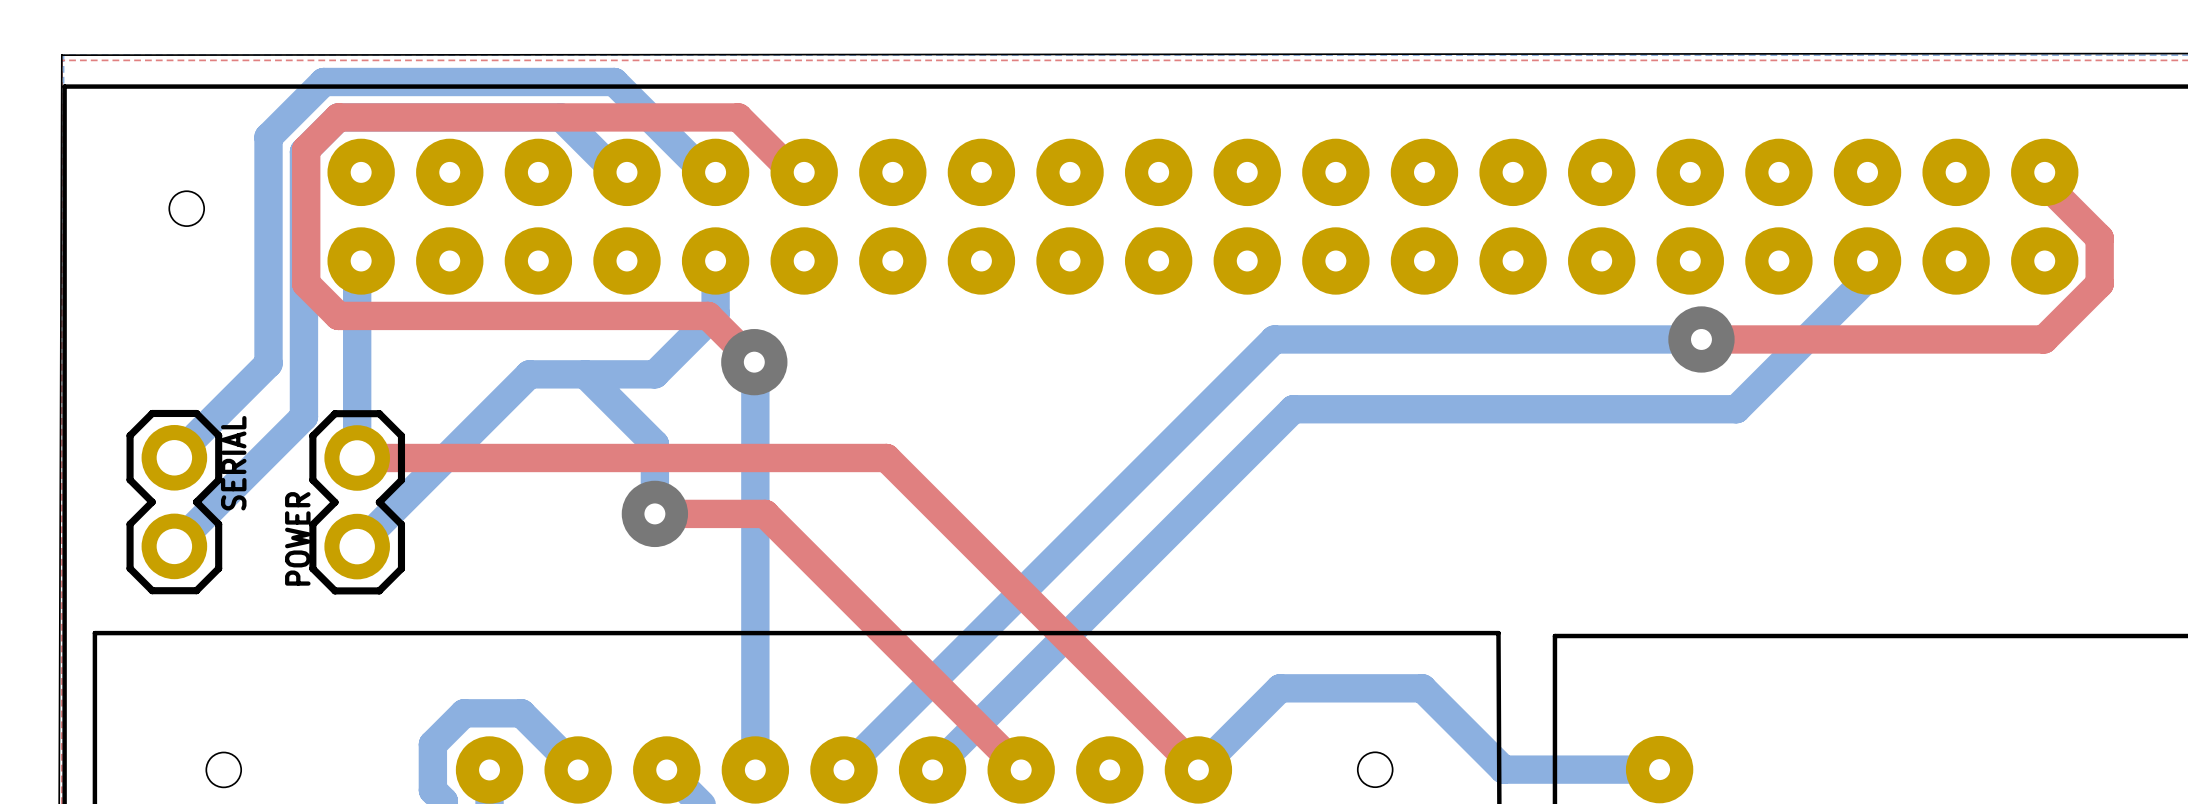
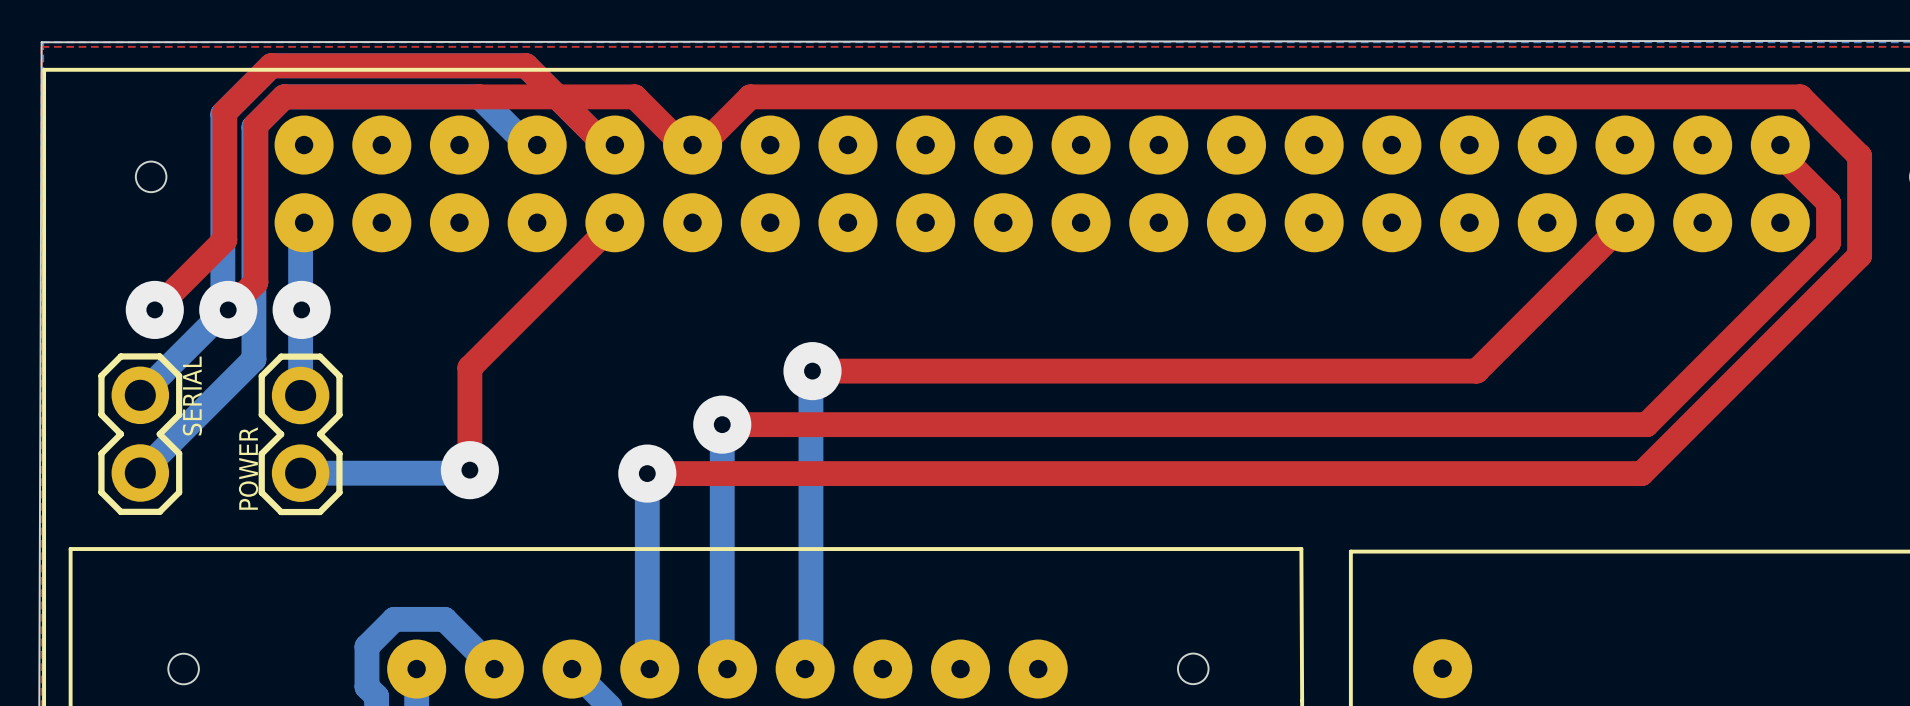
top track: none -> (614, 145) (605, 145) (526, 65) (271, 65) (224, 112) (224, 239) (154, 309)
top track: none -> (692, 145) (702, 145) (750, 96) (1800, 96) (1859, 156) (1859, 255) (1641, 473) (647, 473)
bottom track: (715, 260) (715, 313) (654, 374) (529, 374) (357, 546) -> (469, 470) (466, 473) (300, 473)
top track: none -> (614, 222) (469, 367) (469, 470)
bottom track: (1867, 260) (1867, 278) (1736, 409) (1293, 409) (939, 763) -> (812, 371) (810, 372) (810, 663)
top track: none -> (1624, 222) (1476, 371) (812, 371)
top track: (306, 283) (338, 315) (708, 315) (754, 362) -> (255, 242) (255, 282) (228, 309)
bottom track: (1701, 339) (1274, 339) (843, 769) -> (722, 424) (722, 663) (727, 669)
top track: (1701, 339) (2043, 339) -> (722, 424) (1646, 424) (1779, 291)
via: (1701, 339) -> none
via: none -> (154, 309)
via: none -> (228, 309)
via: none -> (301, 309)
bottom track: (754, 362) (755, 769) -> (647, 473) (647, 666) (649, 669)
via: (754, 362) -> none
bottom track: (585, 374) (654, 444) (654, 513) -> none
via: none -> (812, 371)
top track: (357, 457) (886, 457) (1198, 769) -> none
via: none -> (722, 424)
top track: (654, 513) (765, 513) (1021, 769) -> none
via: (654, 513) -> none
via: none -> (469, 470)
via: none -> (647, 473)
bottom track: (1659, 769) (1503, 769) (1422, 688) (1280, 688) (1198, 769) -> none

